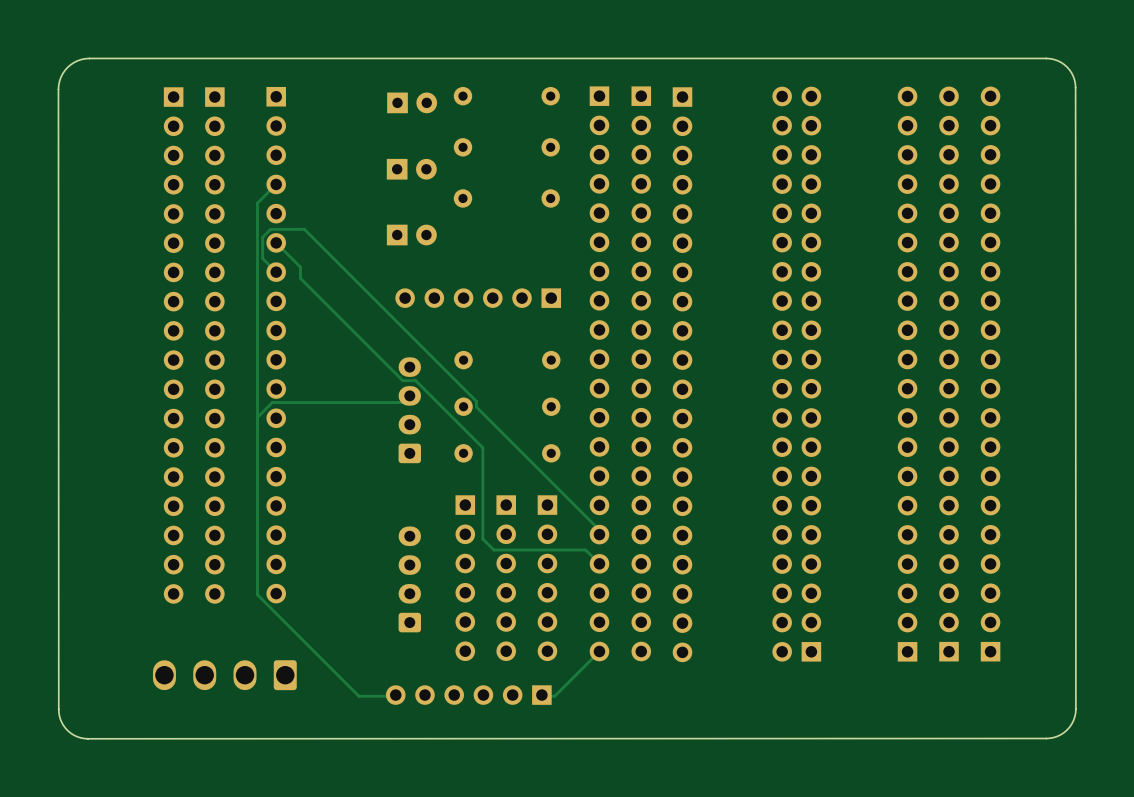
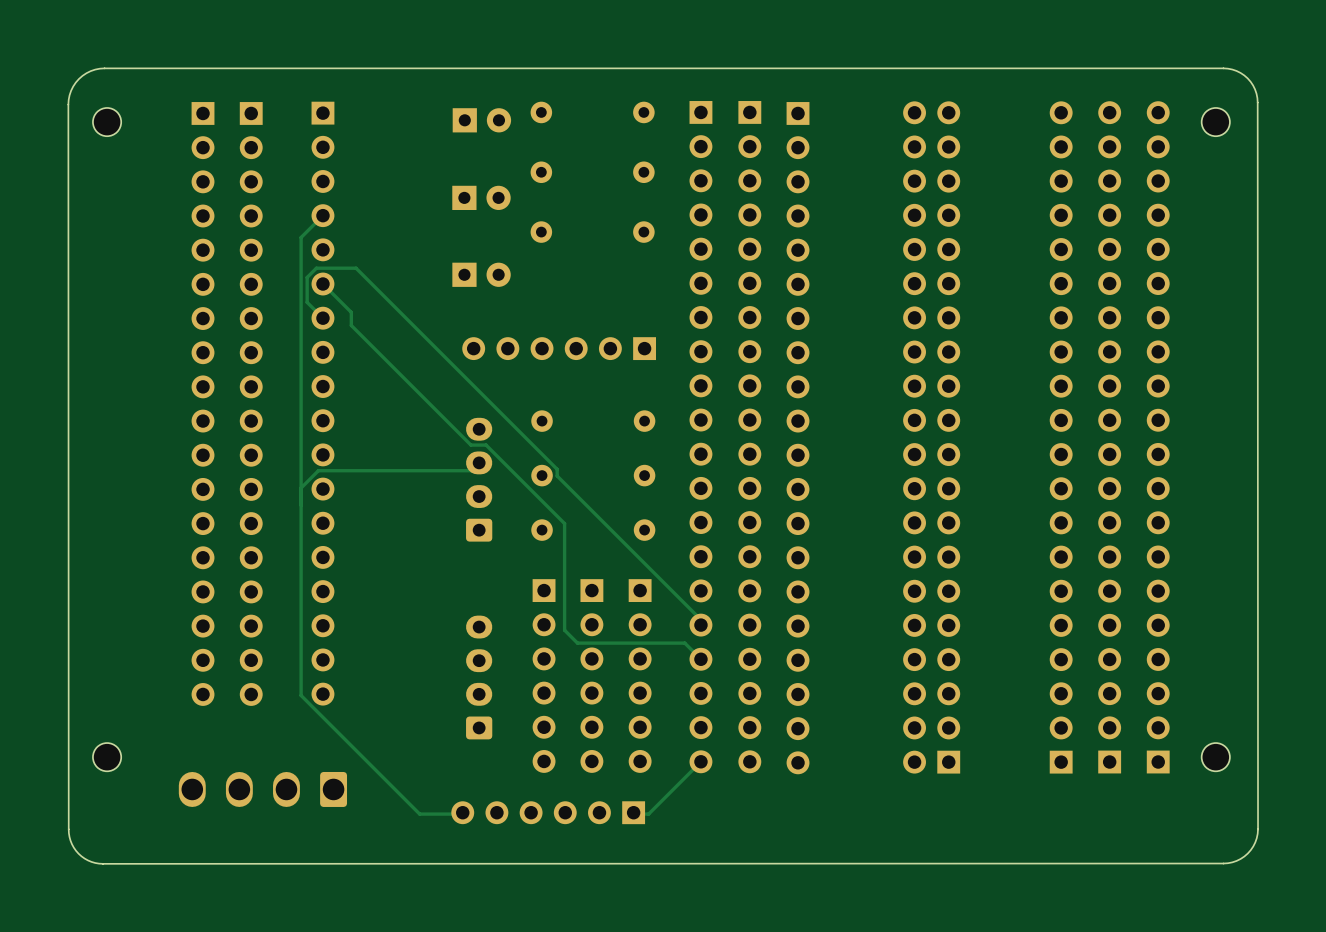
part: none -> (107, 122)
part: none -> (1215, 122)
part: none -> (107, 757)
part: none -> (1215, 757)

